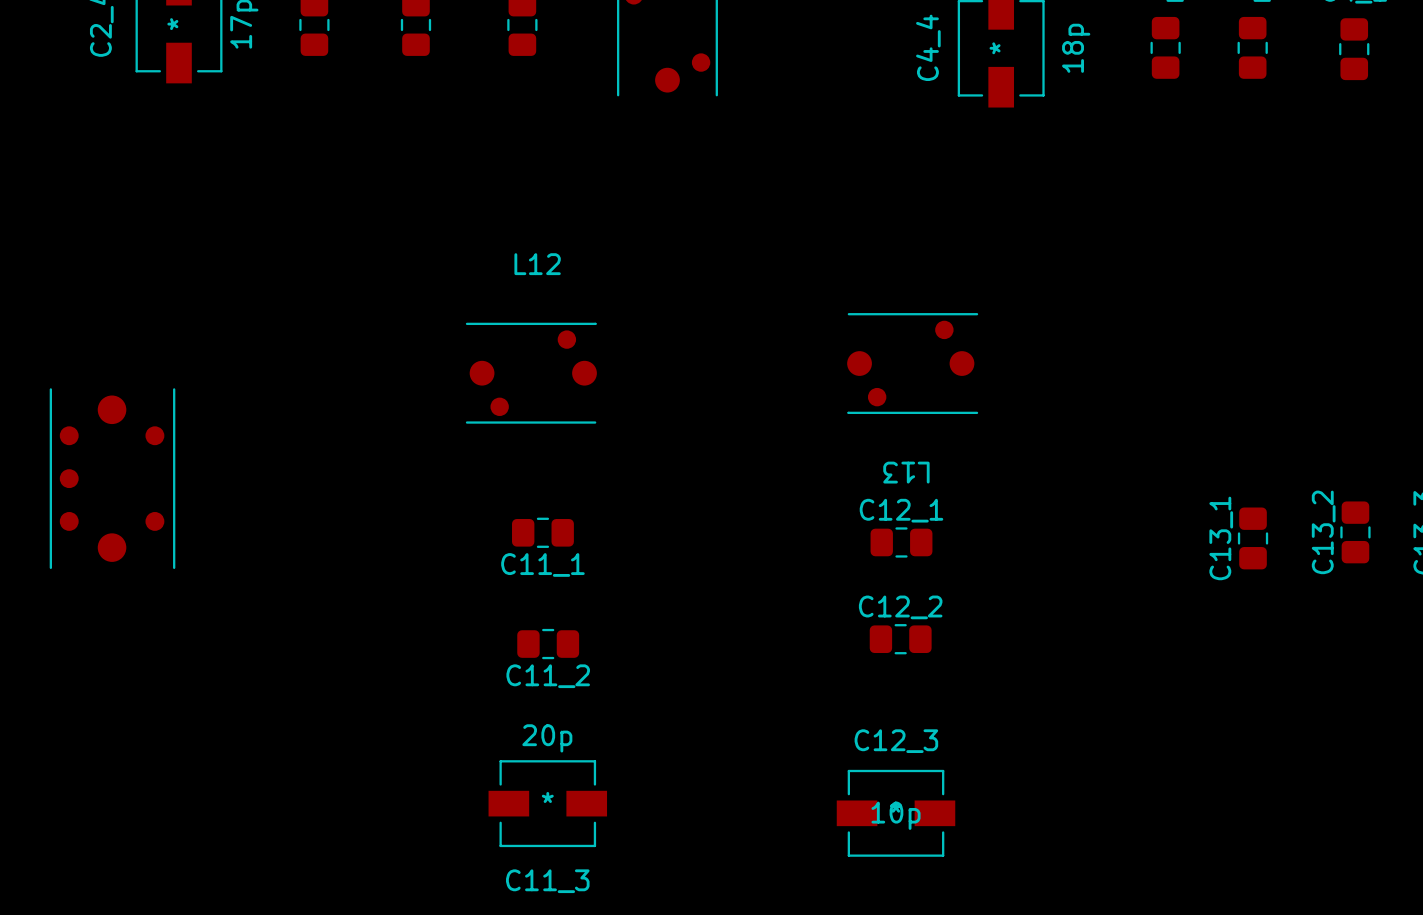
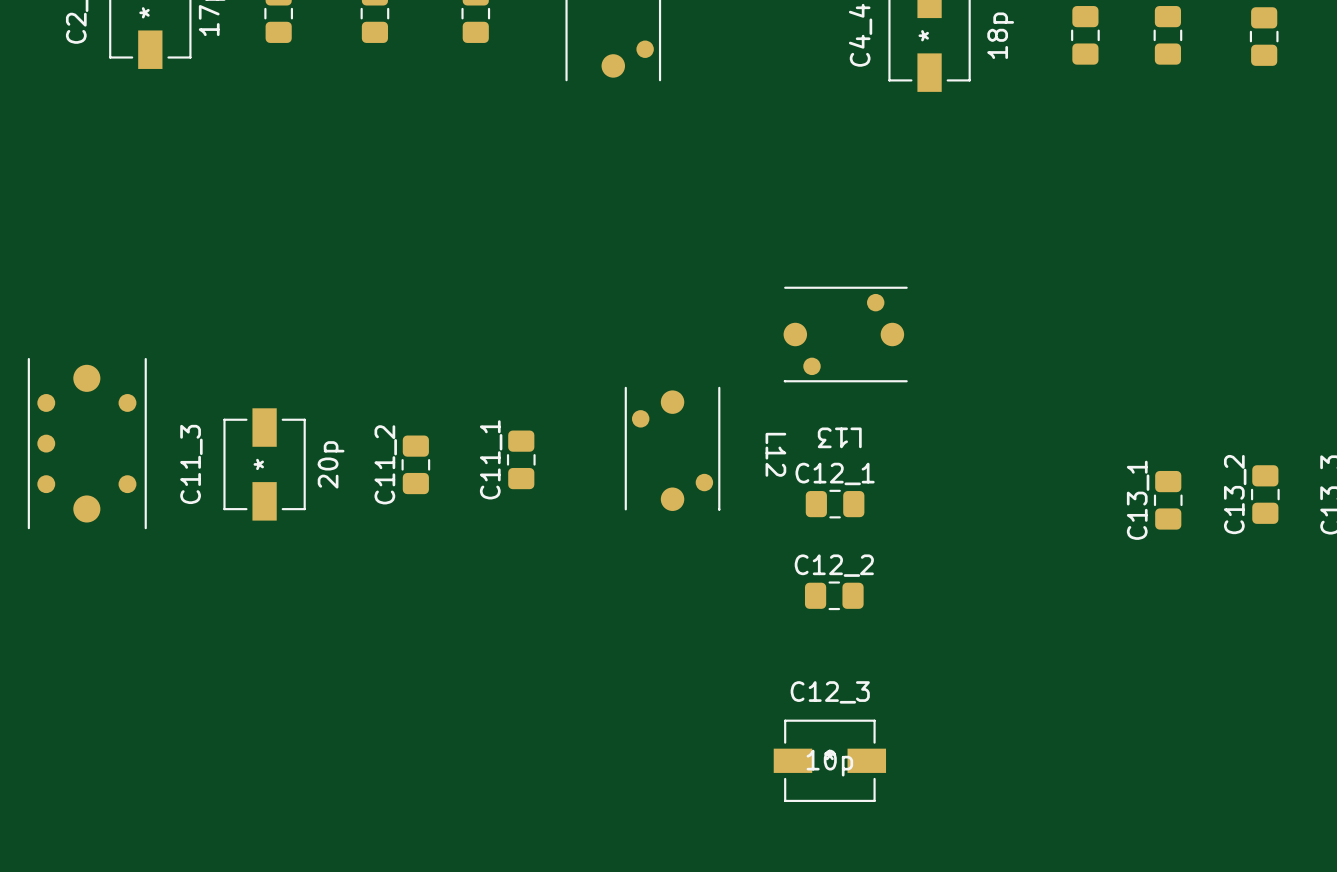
L12 rotation: 0° (531, 373) -> 90° clockwise (672, 448)
L12 position: (531, 373) -> (672, 448)
C11_1 rotation: 0° (542, 532) -> 90° clockwise (521, 459)
C11_1 position: (542, 532) -> (521, 459)
C11_2 rotation: 0° (548, 644) -> 90° clockwise (415, 464)
C11_2 position: (548, 644) -> (415, 464)
C11_3 rotation: 0° (547, 803) -> 90° clockwise (264, 464)
C11_3 position: (547, 803) -> (264, 464)

